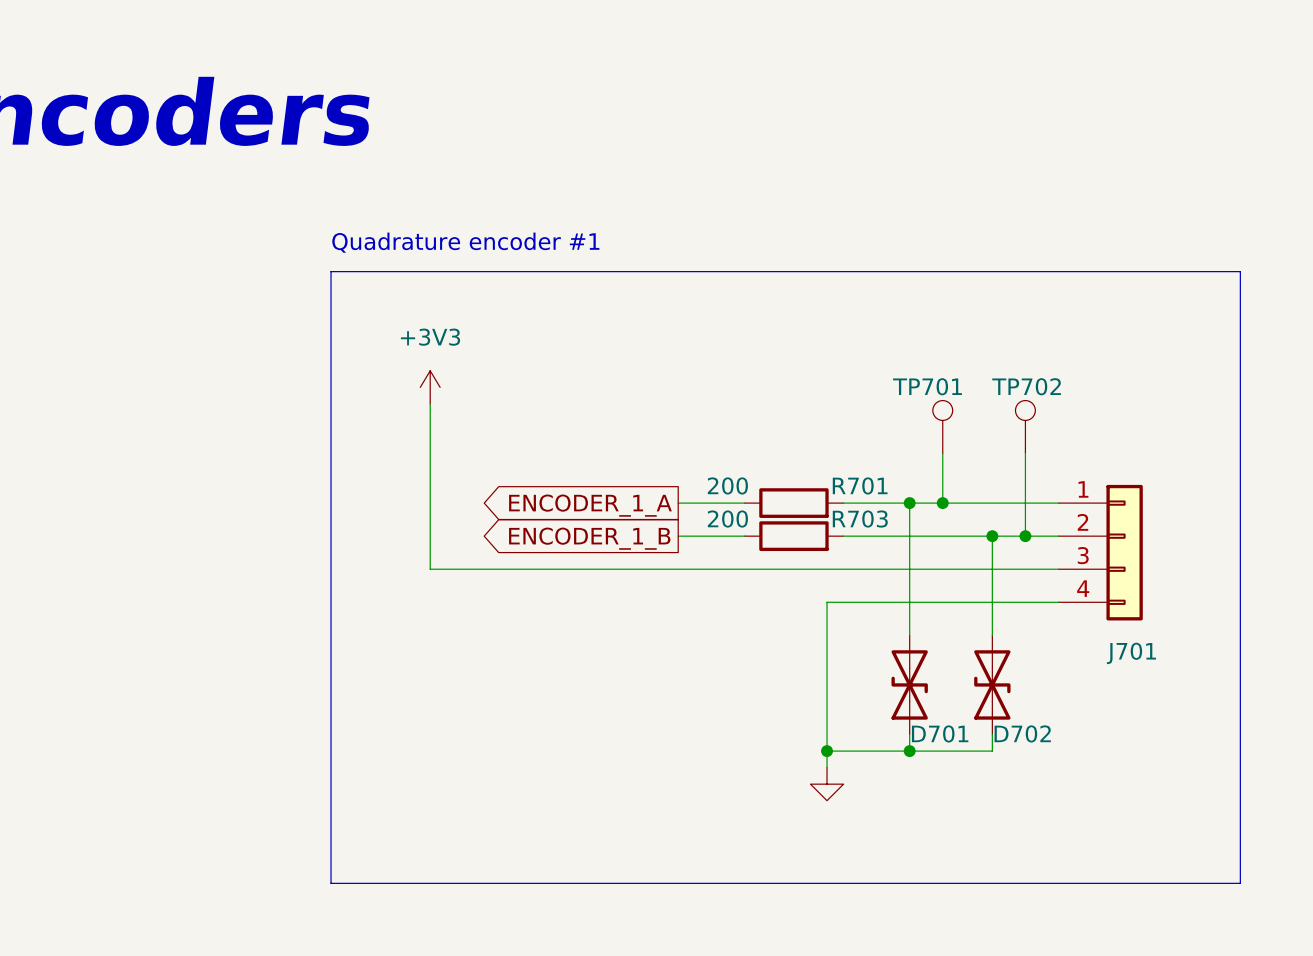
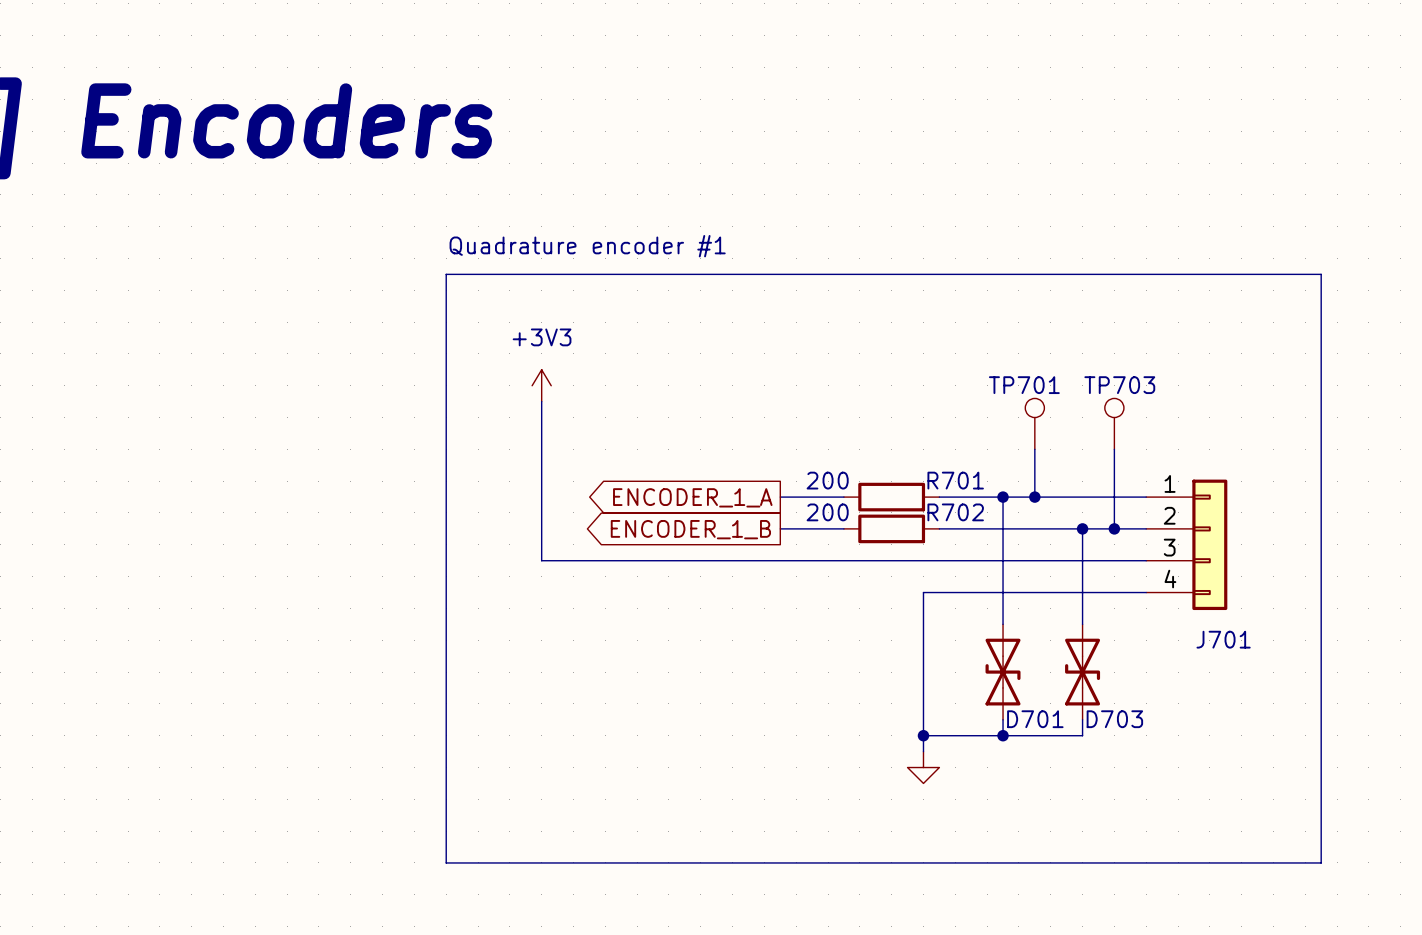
TP702 name: TP702 (1026, 386) -> TP703 (1119, 385)
R703 name: R703 (860, 519) -> R702 (955, 512)
D702 name: D702 (1022, 733) -> D703 (1114, 719)

